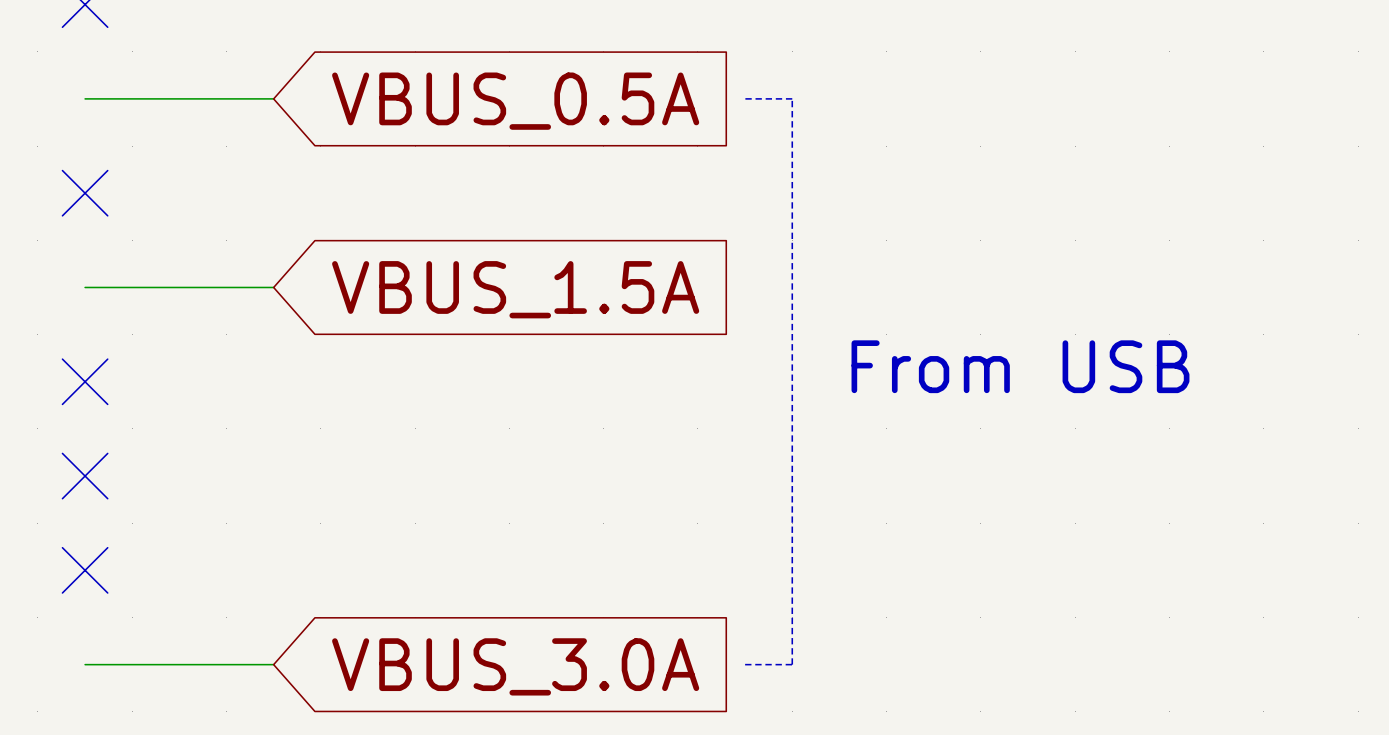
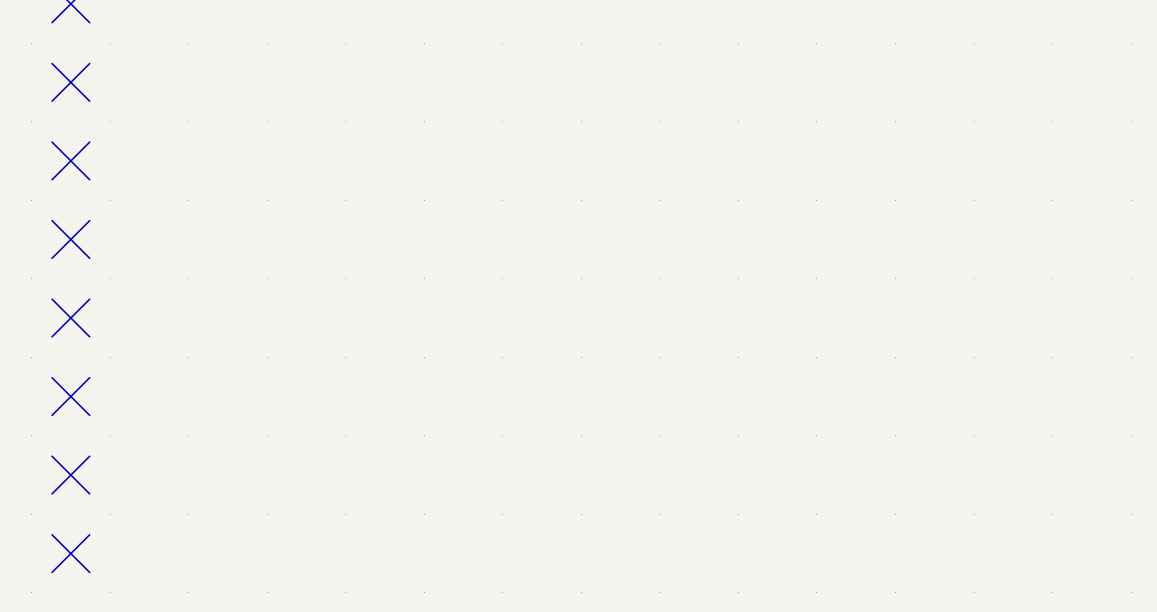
wire: (85, 98) (273, 98) -> none
no-connect mark: none -> (70, 82)
line: (745, 98) (792, 98) (792, 664) (745, 664) -> none
global label: VBUS_0.5A (515, 101) -> none
wire: (85, 287) (273, 287) -> none
no-connect mark: none -> (70, 239)
global label: VBUS_1.5A (515, 289) -> none
text: From USB (1020, 366) -> none
wire: (85, 664) (273, 664) -> none
no-connect mark: none -> (70, 553)
global label: VBUS_3.0A (515, 666) -> none

